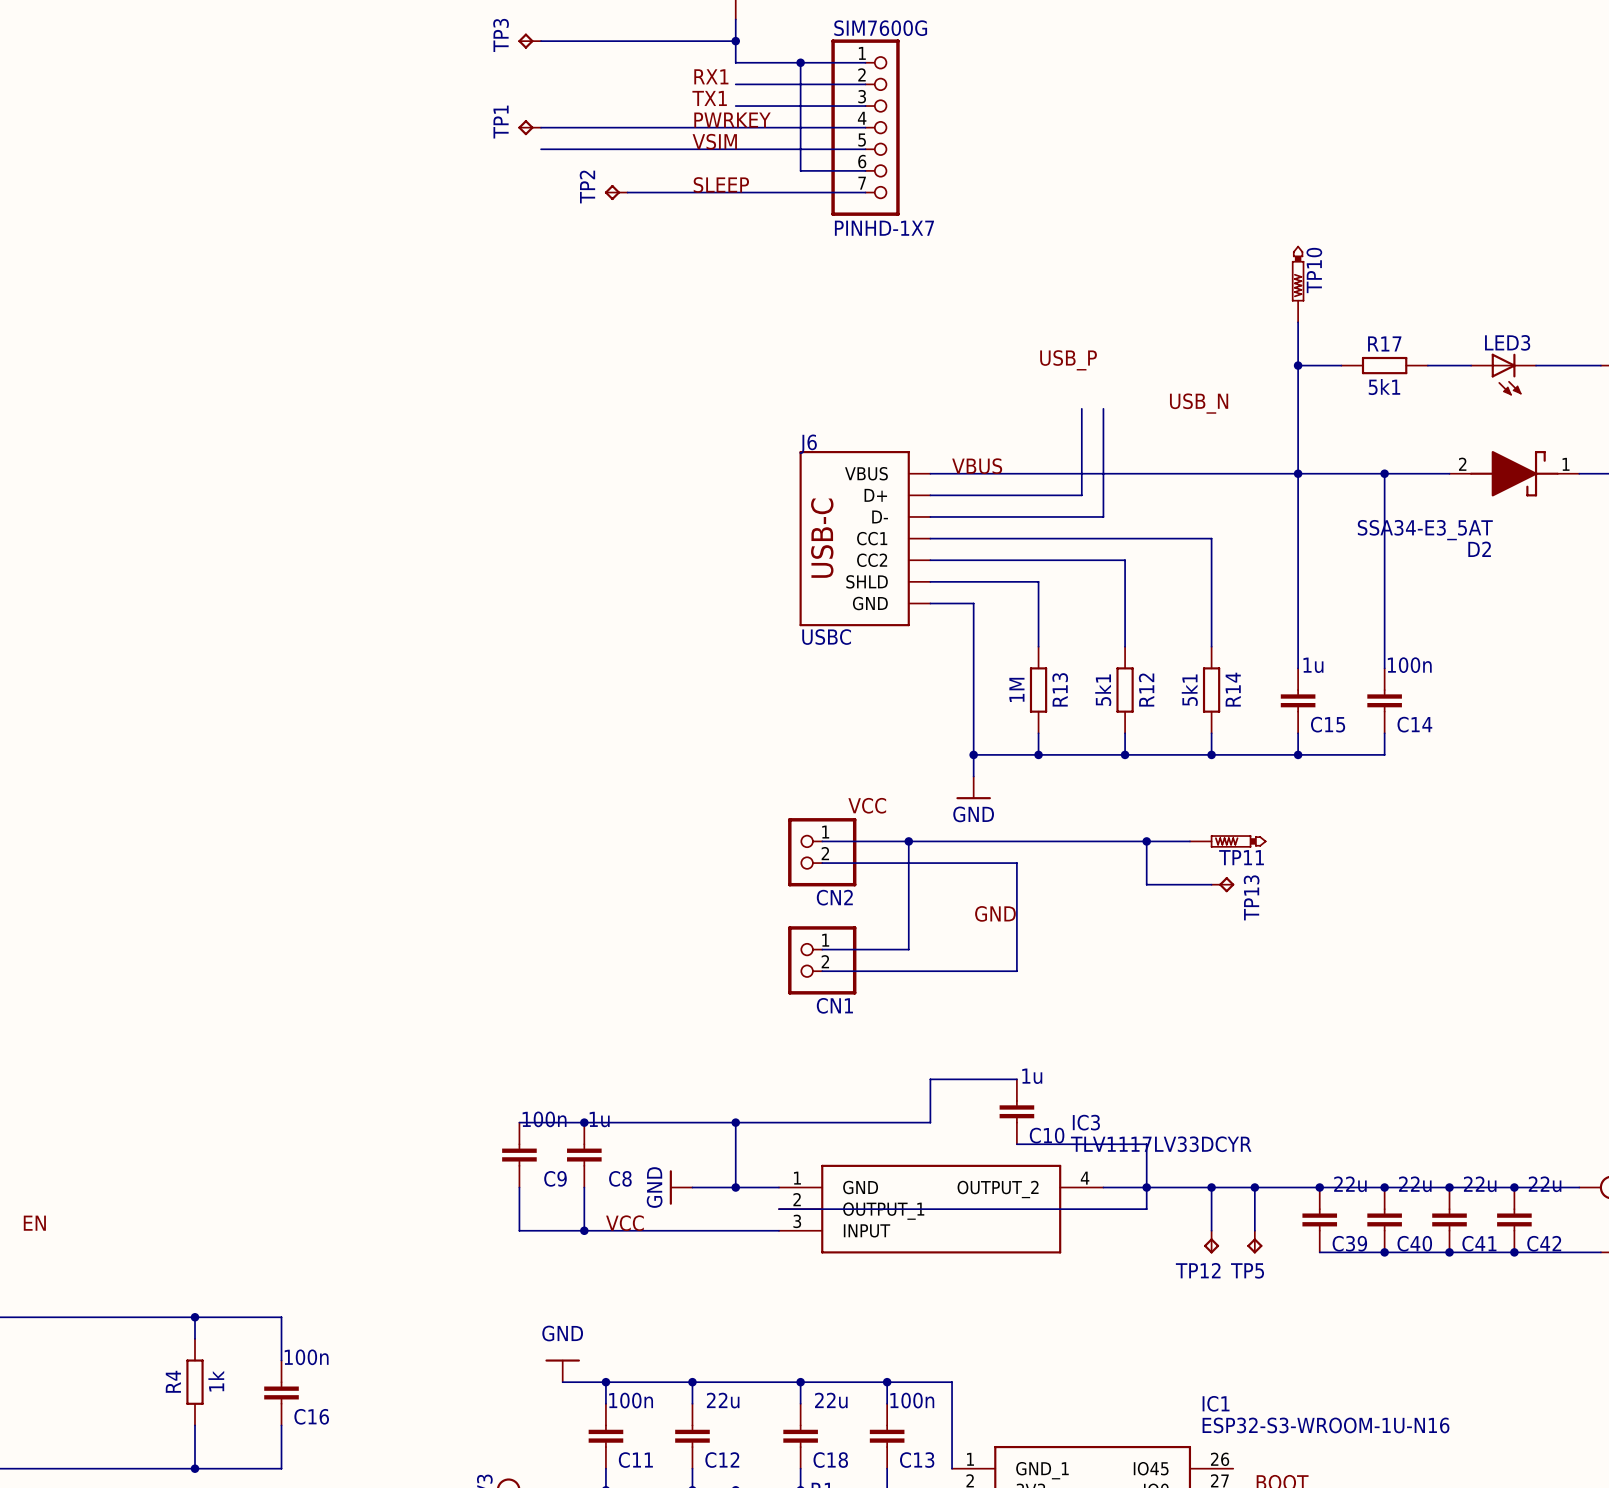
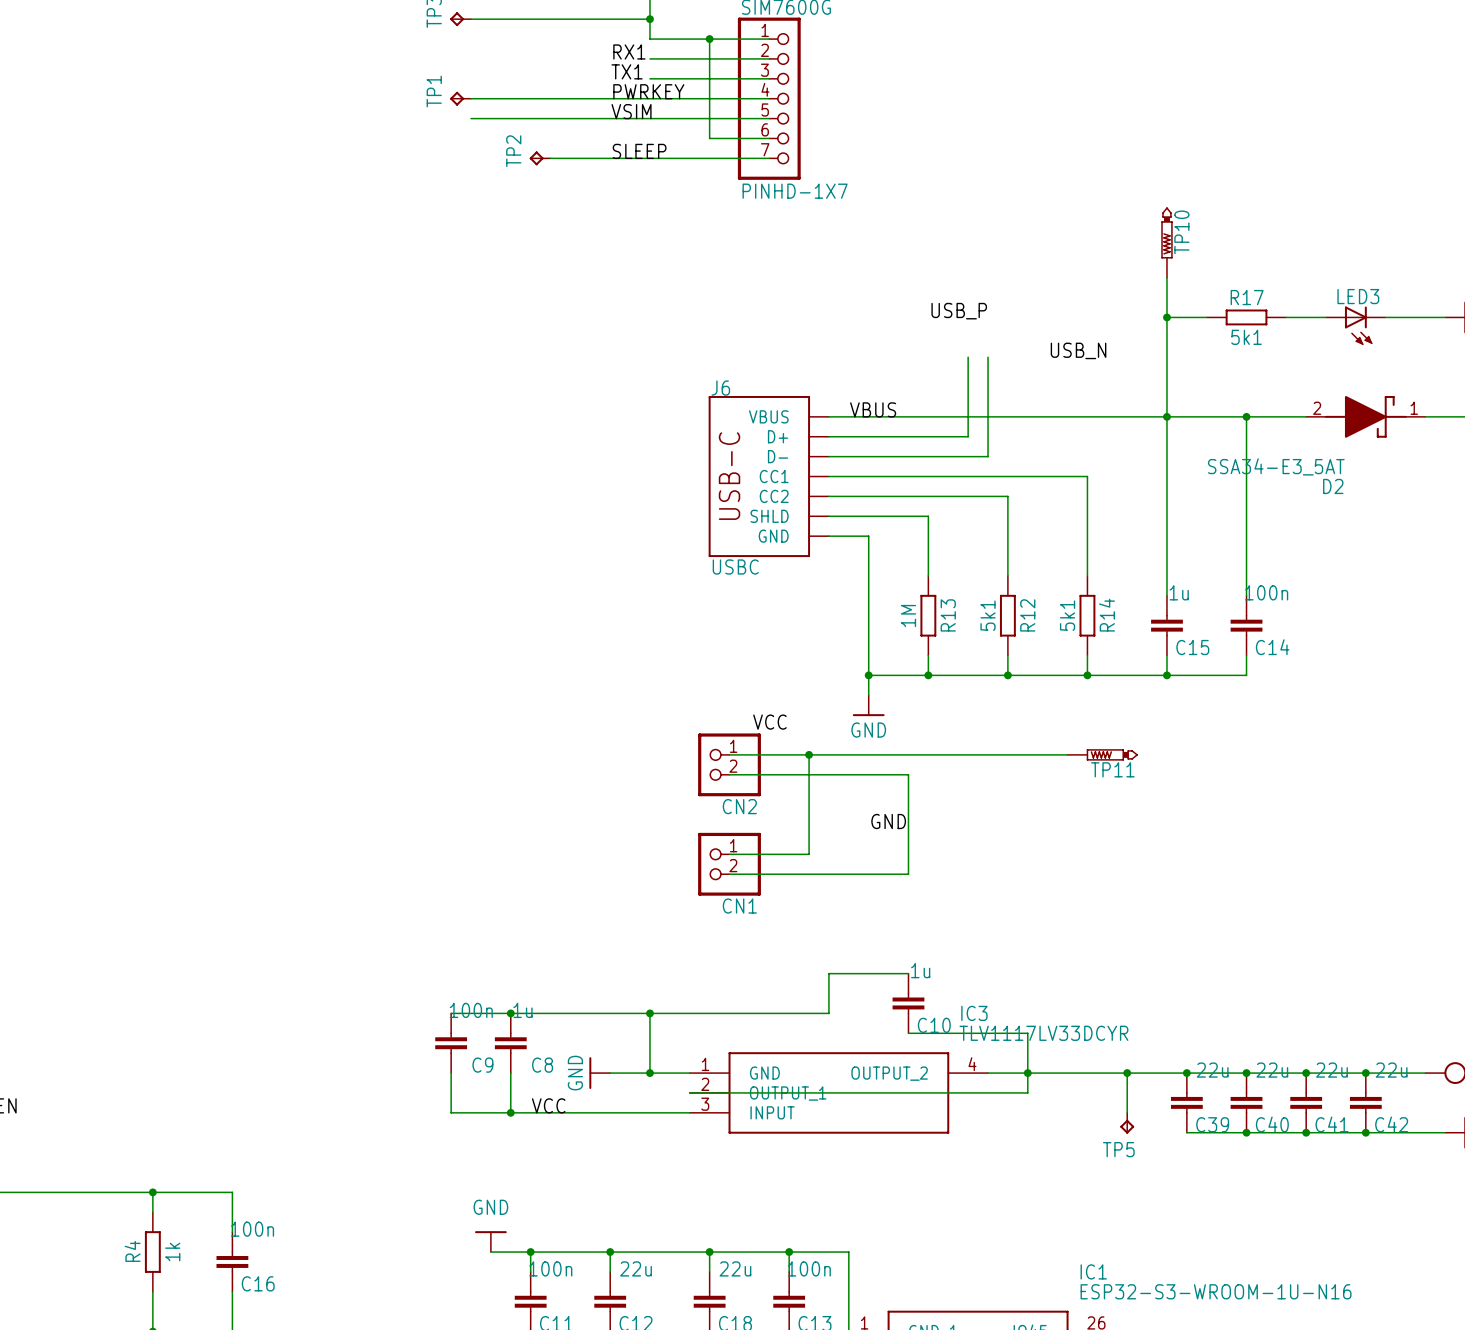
wire: (1146, 841) (1146, 884) (1211, 884) -> none
junction: (1146, 841) -> none
TP13: (1222, 884) -> none
wire: (1211, 1187) (1211, 1230) -> none
junction: (1211, 1187) -> none
TP12: (1211, 1242) -> none

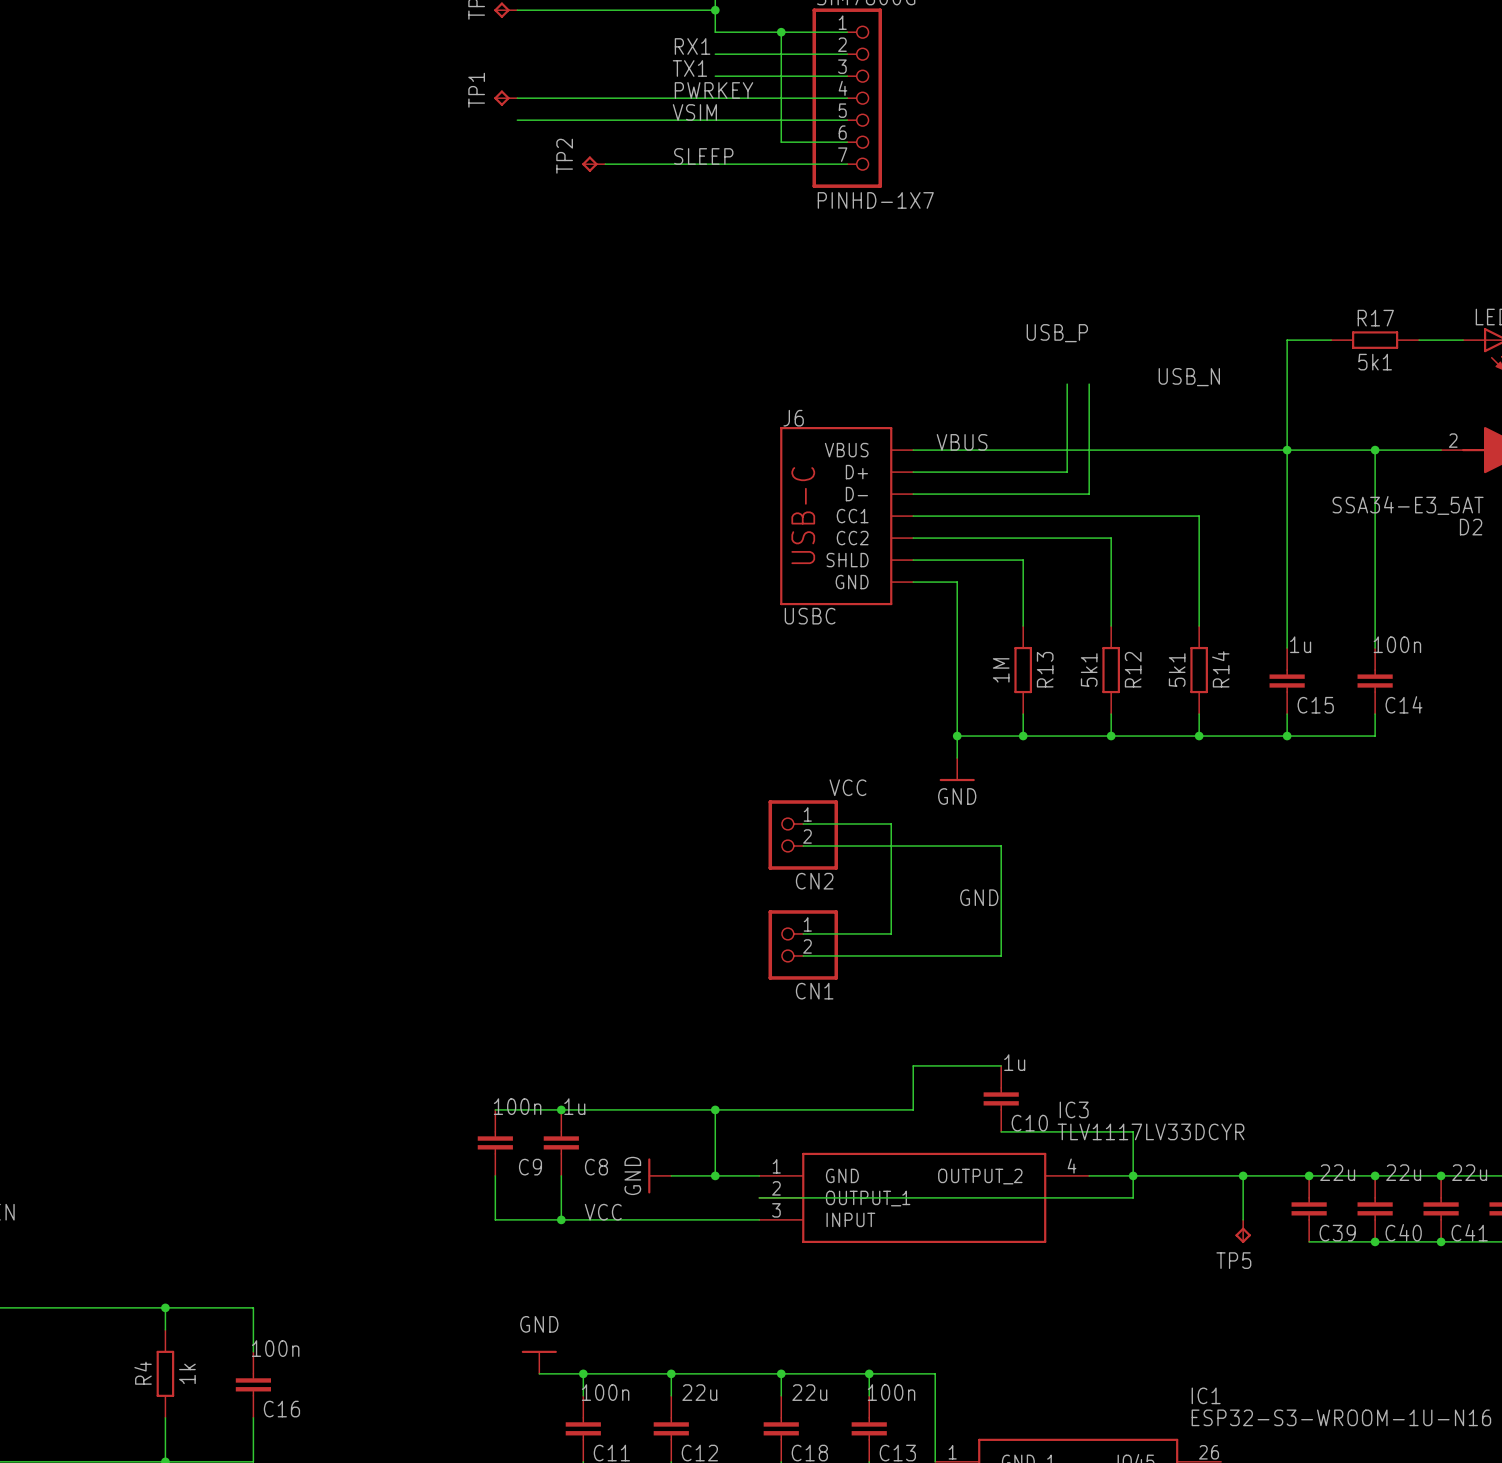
TP10: (1166, 242) -> none
wire: (1166, 277) (1166, 317) -> none
junction: (1166, 317) -> none
wire: (809, 754) (1067, 754) -> none
junction: (809, 754) -> none
TP11: (1102, 754) -> none

